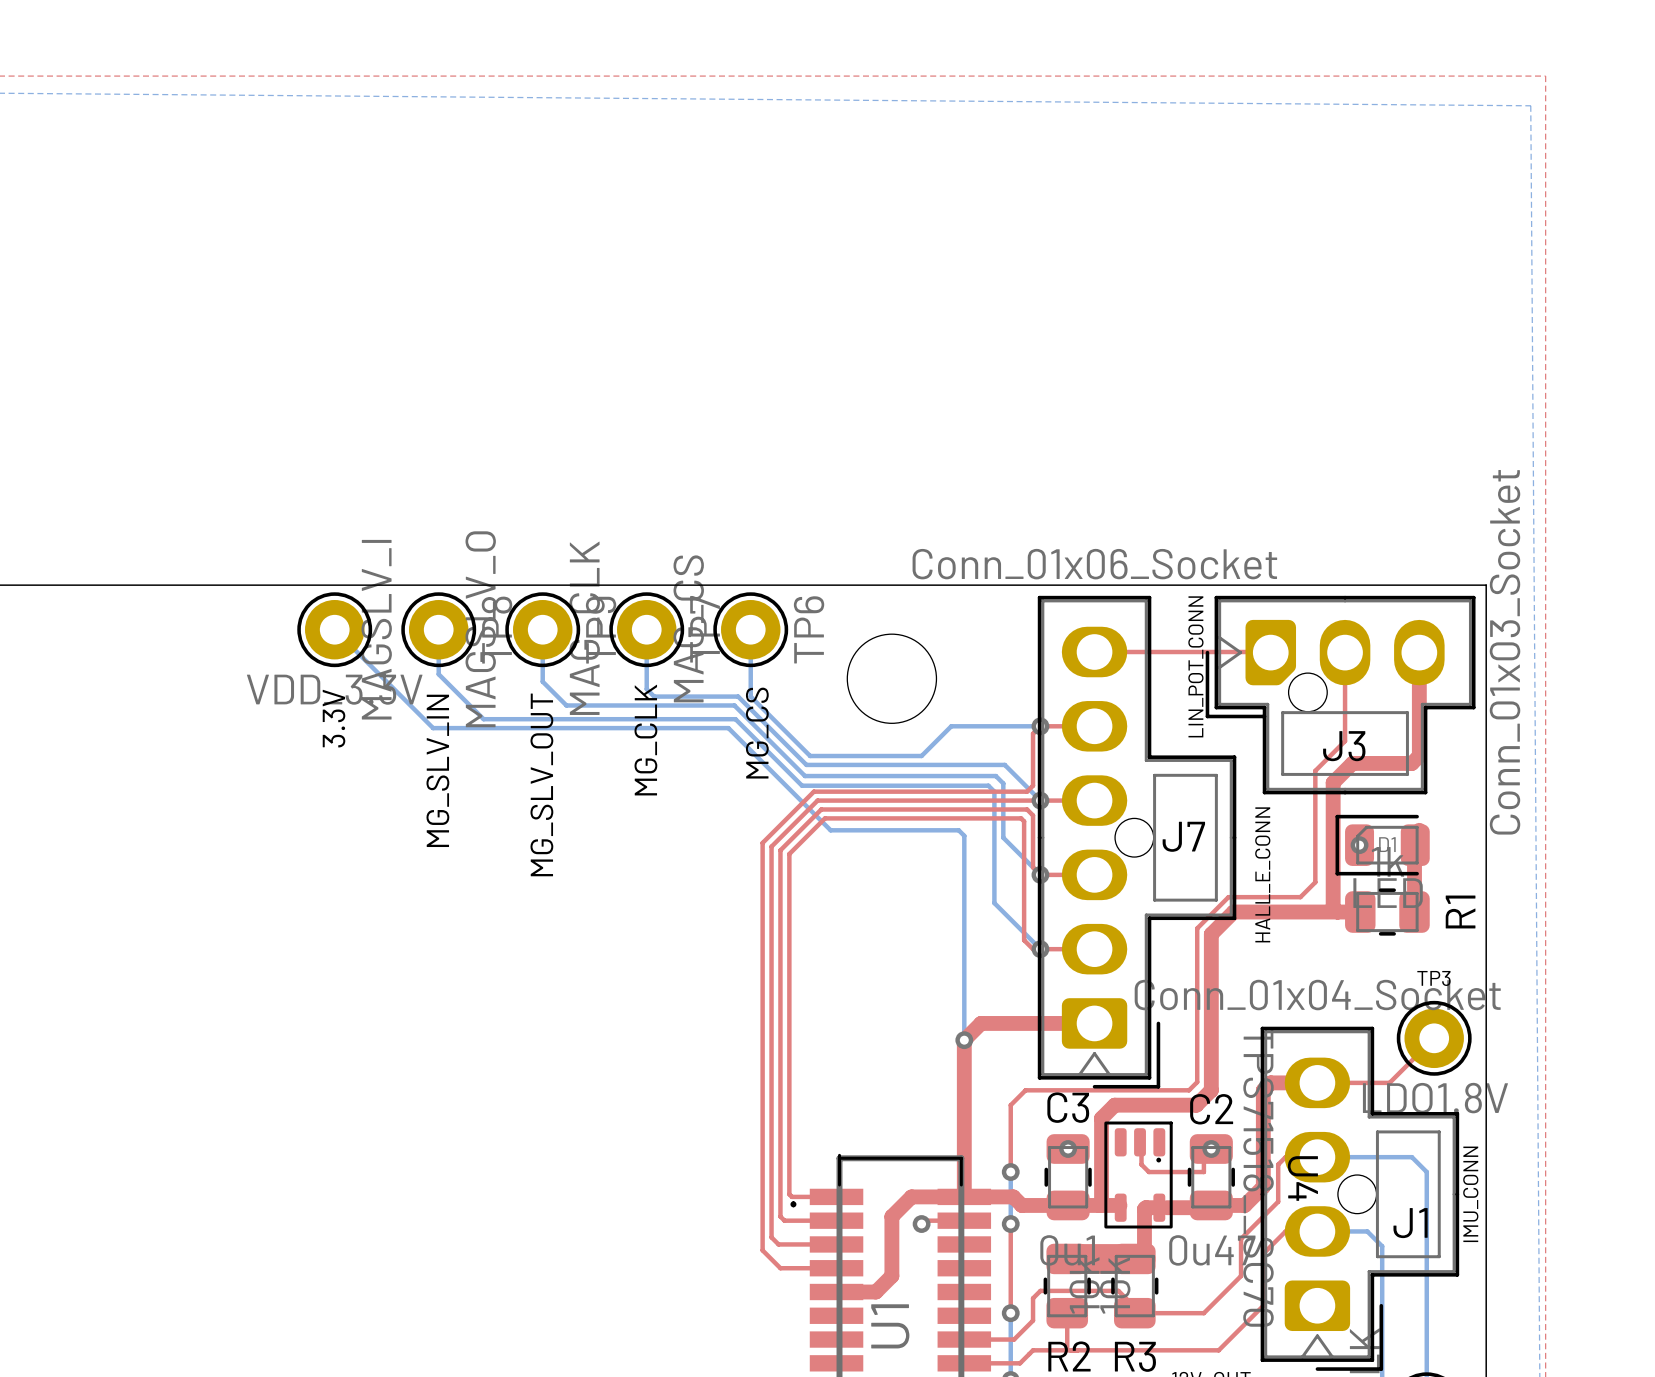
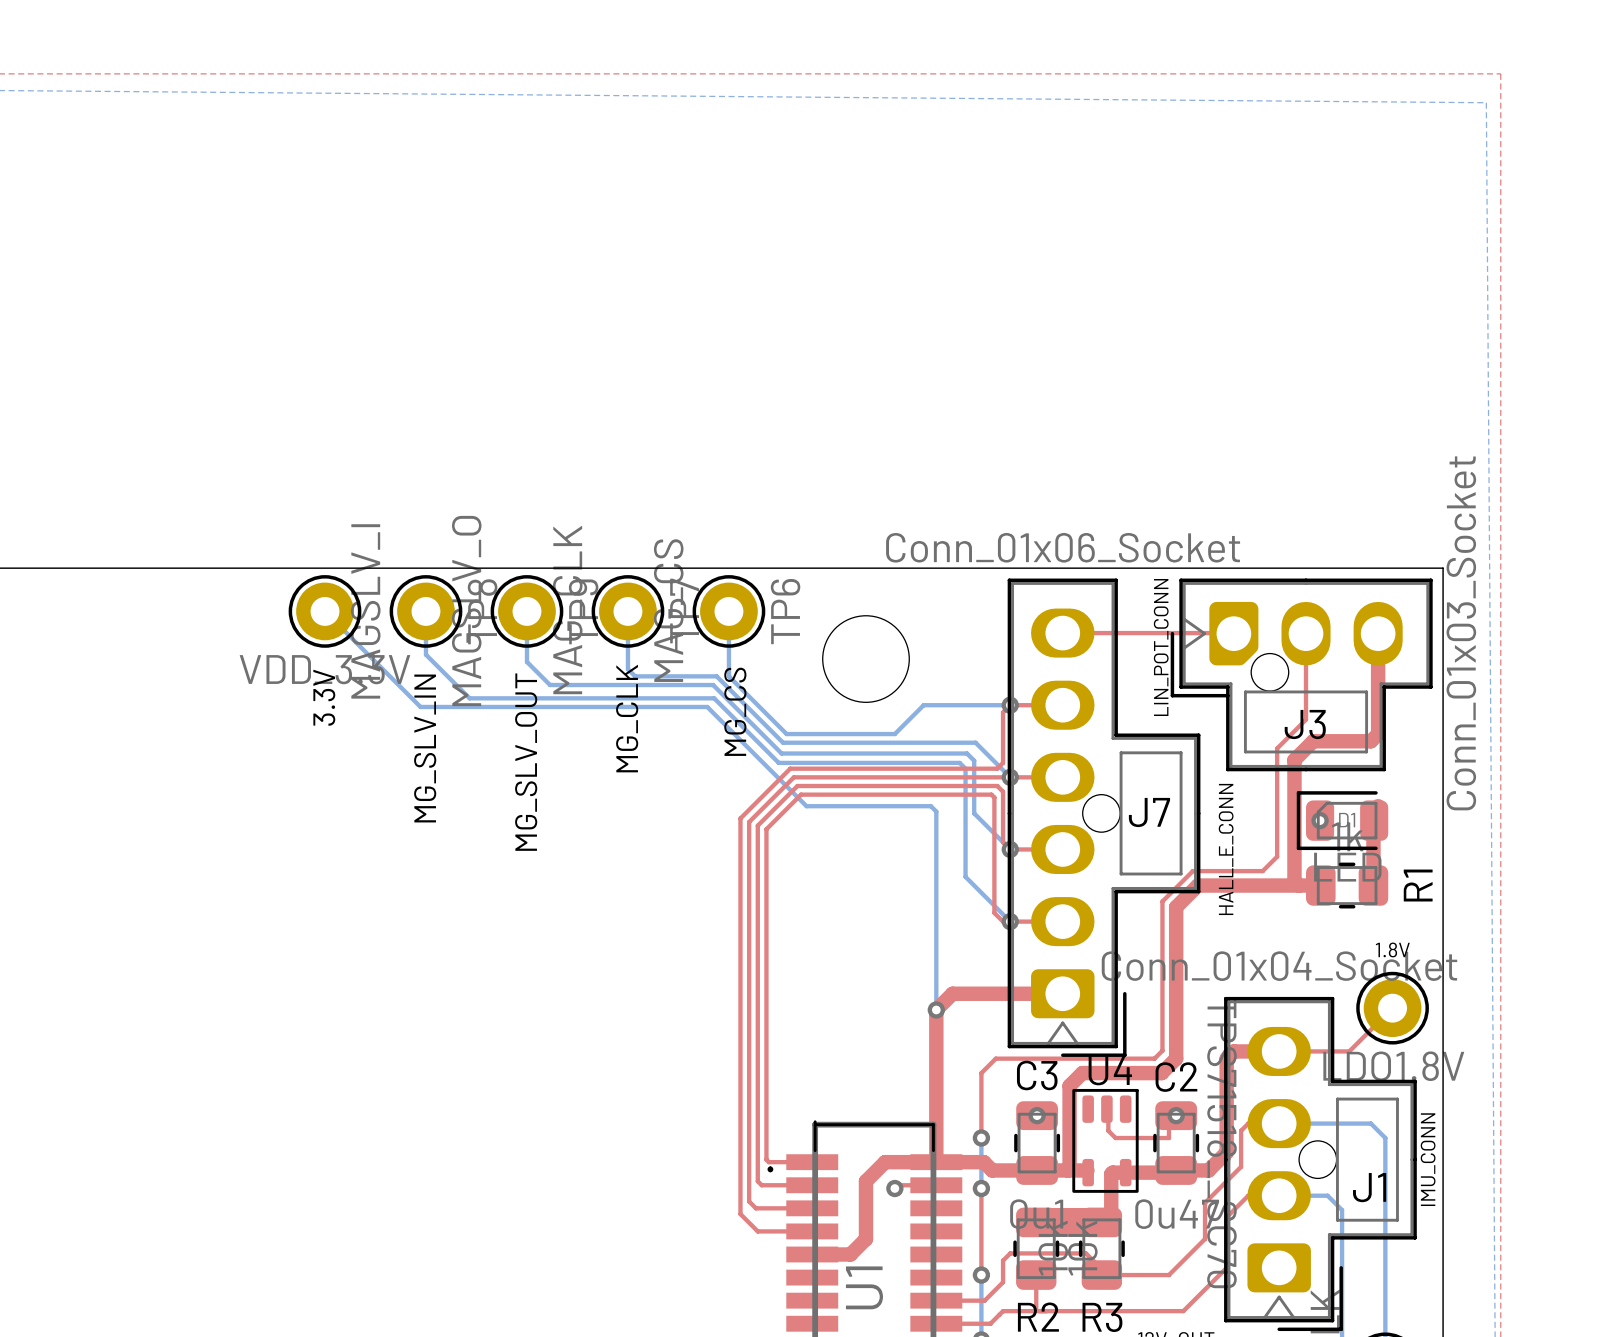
TP3 name: TP3 (1433, 978) -> 1.8V (1392, 949)
U4 text: . (1158, 1160) -> none
U4 name rotation: 0° (1302, 1178) -> 90° counterclockwise (1110, 1070)
U4 name position: U4 (1302, 1178) -> U4 (1110, 1070)

